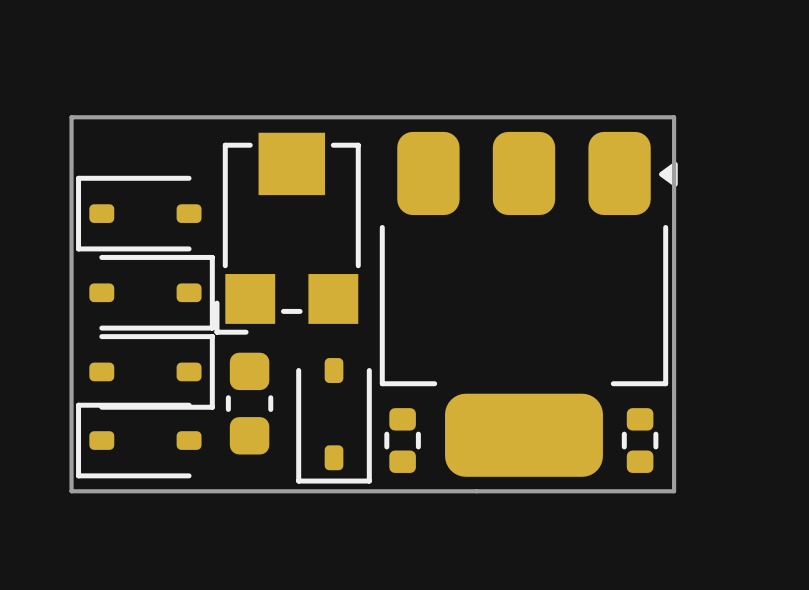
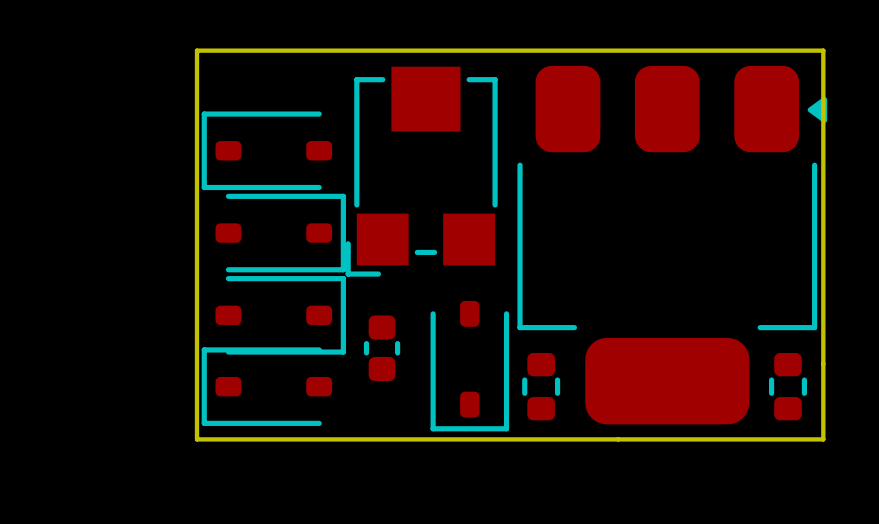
part footprint: [225, 352, 274, 455] -> [363, 315, 401, 382]

